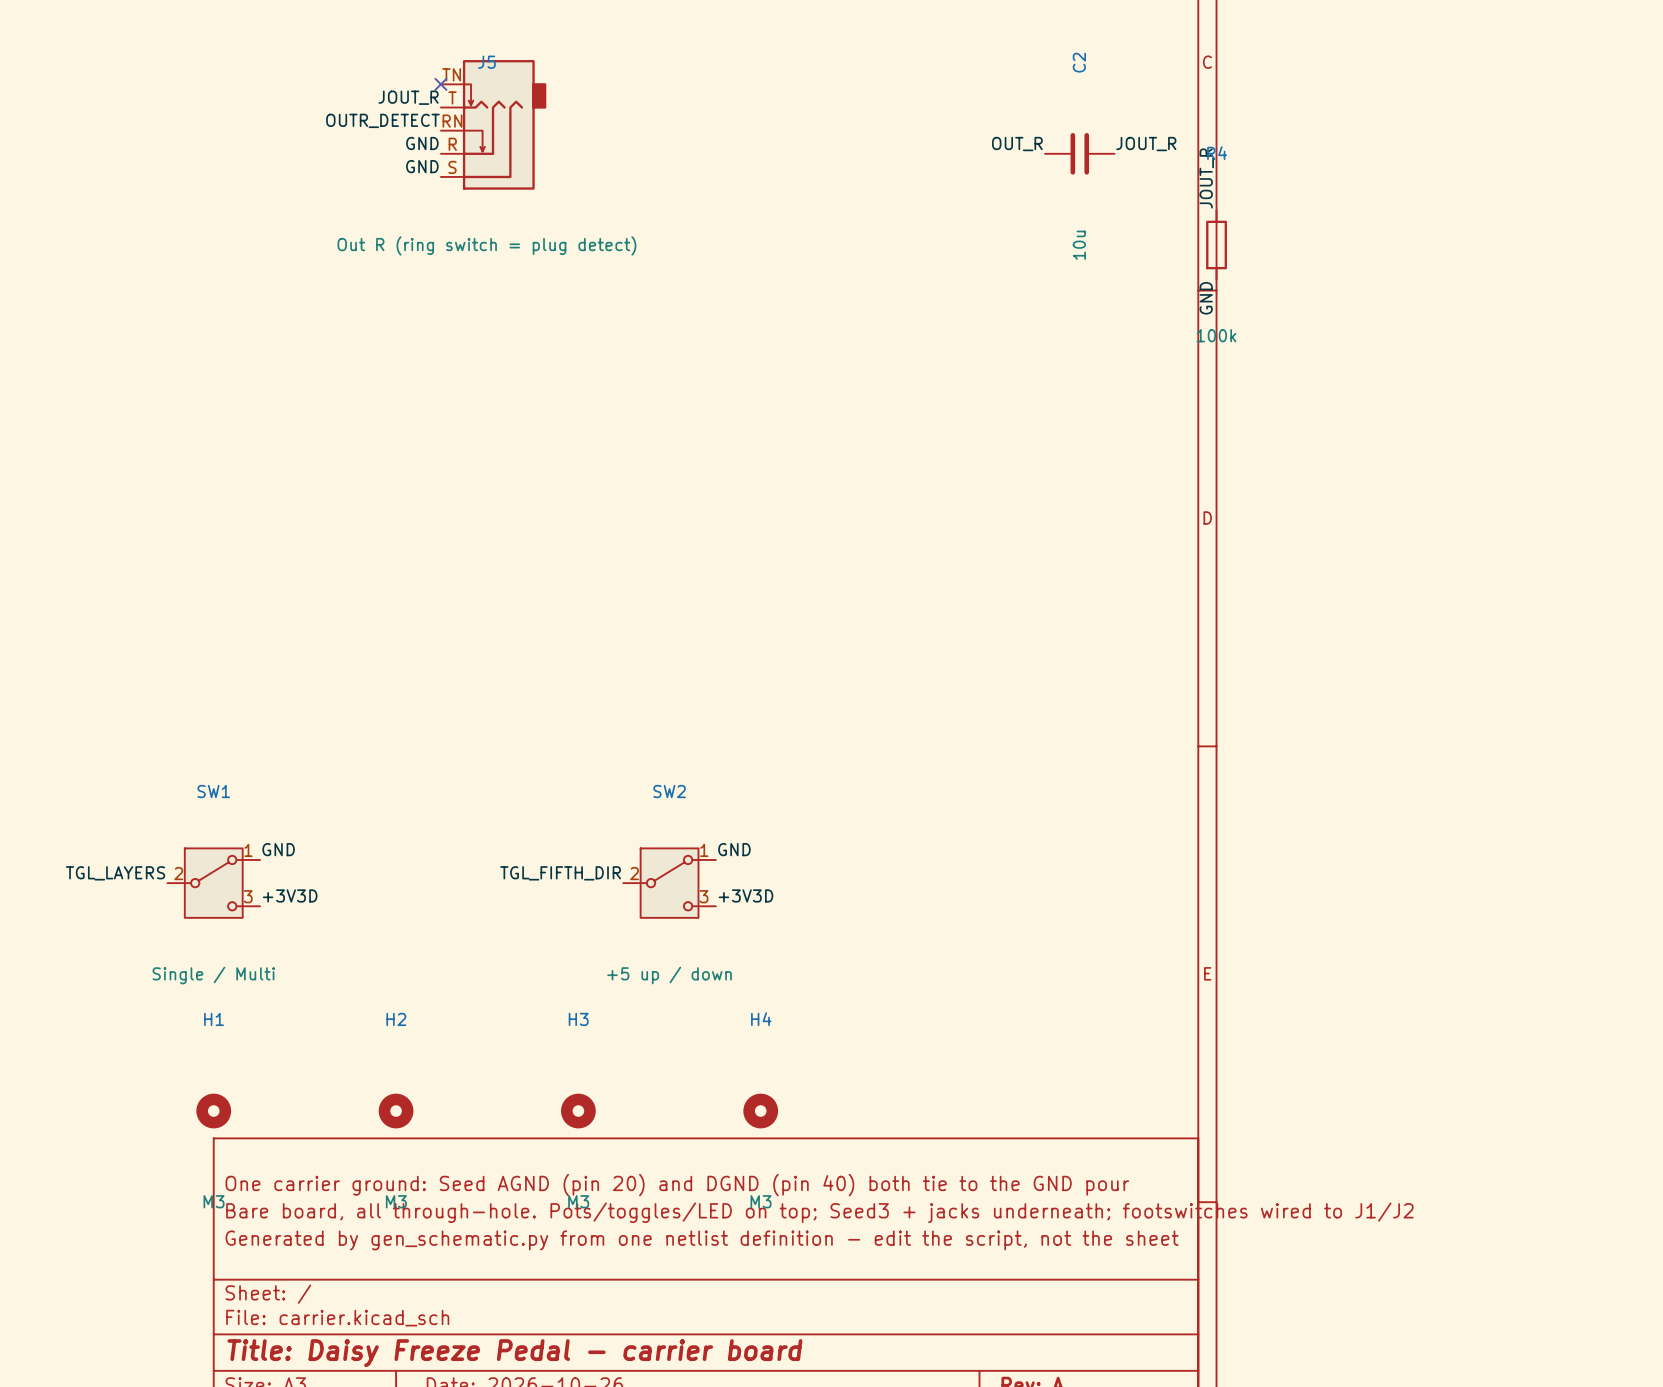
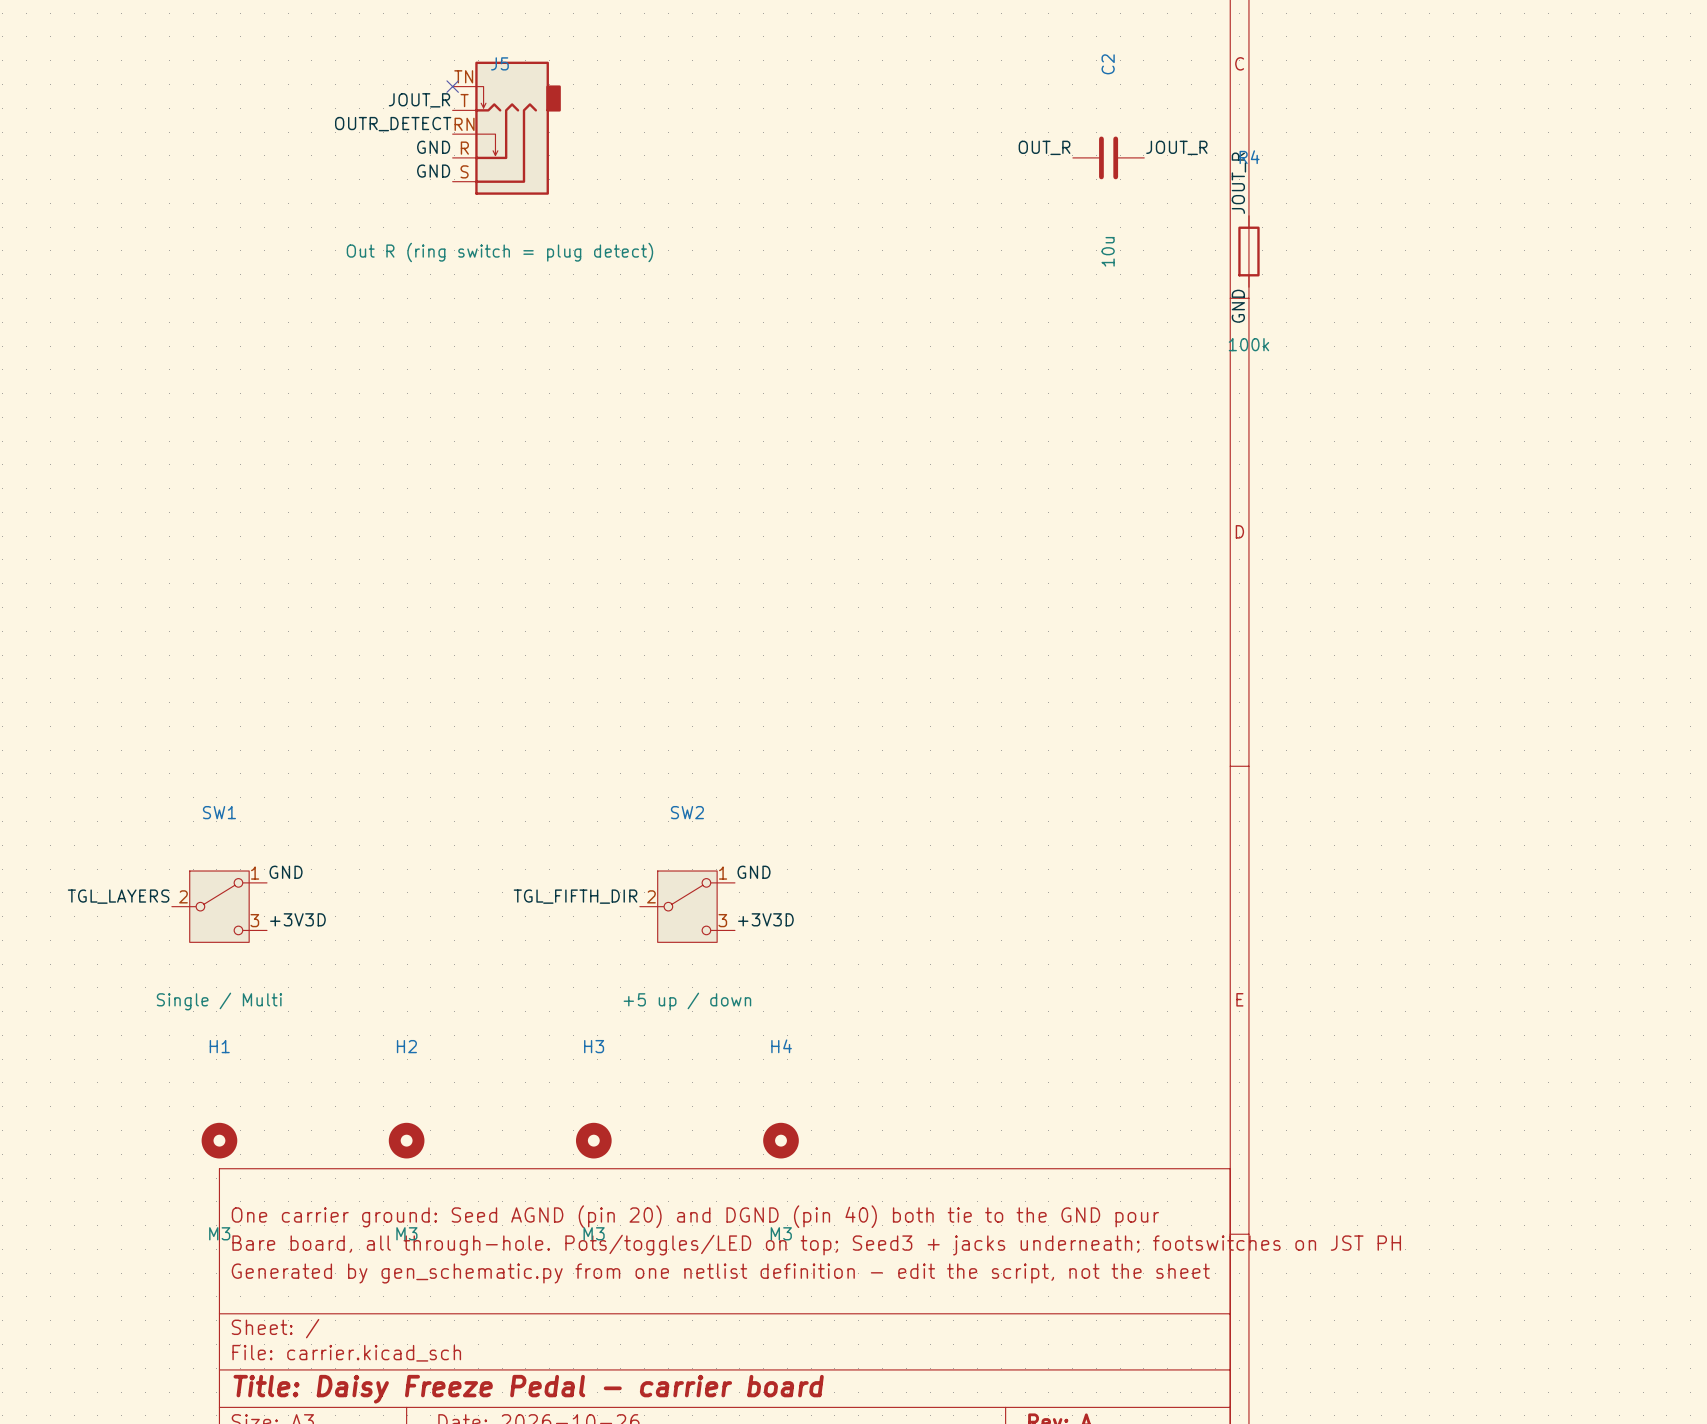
title block: Bare board, all through-hole. Pots/toggles/LED on top; Seed3 + jacks underneath; footswitches wired to J1/J2 (819, 1212) -> Bare board, all through-hole. Pots/toggles/LED on top; Seed3 + jacks underneath; footswitches on JST PH (816, 1245)

